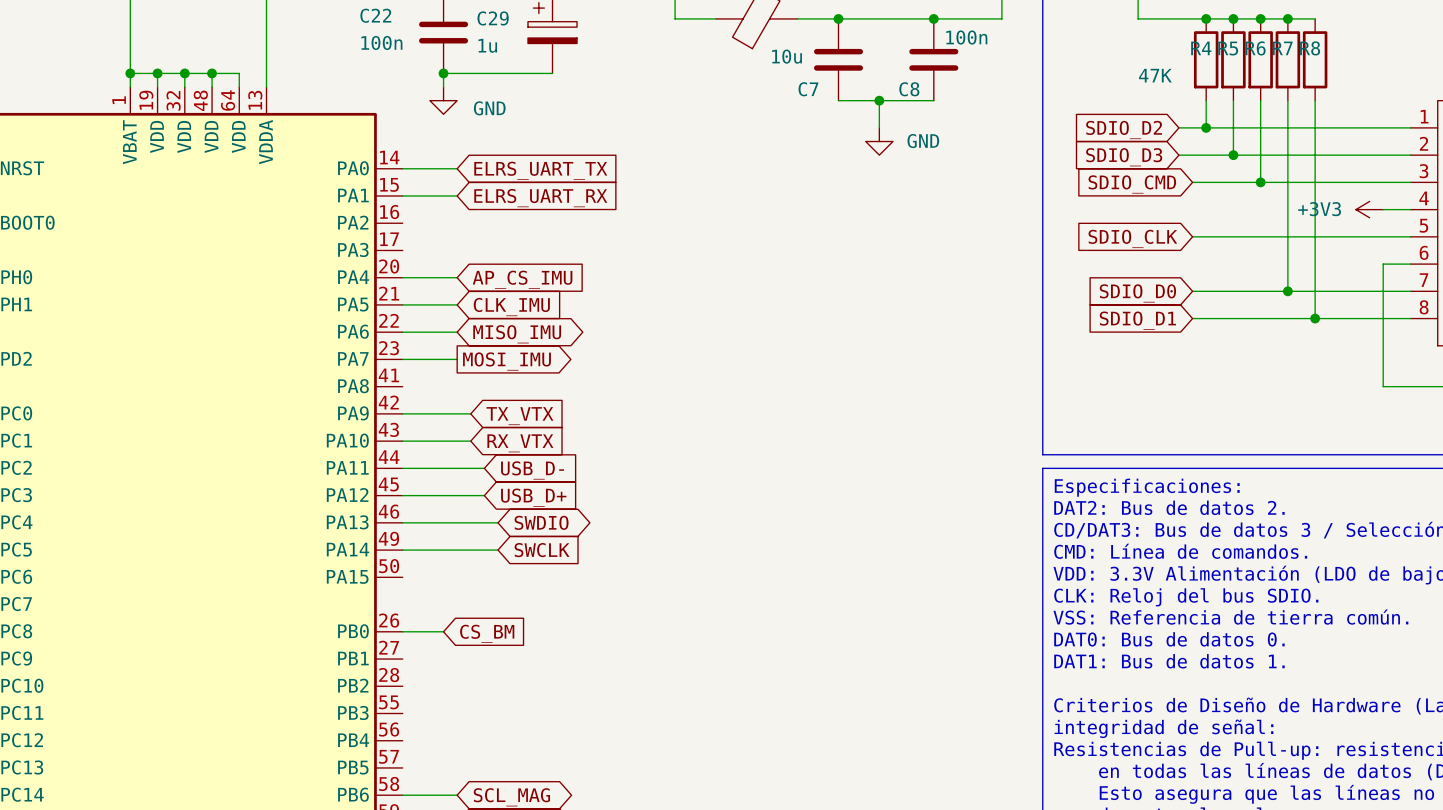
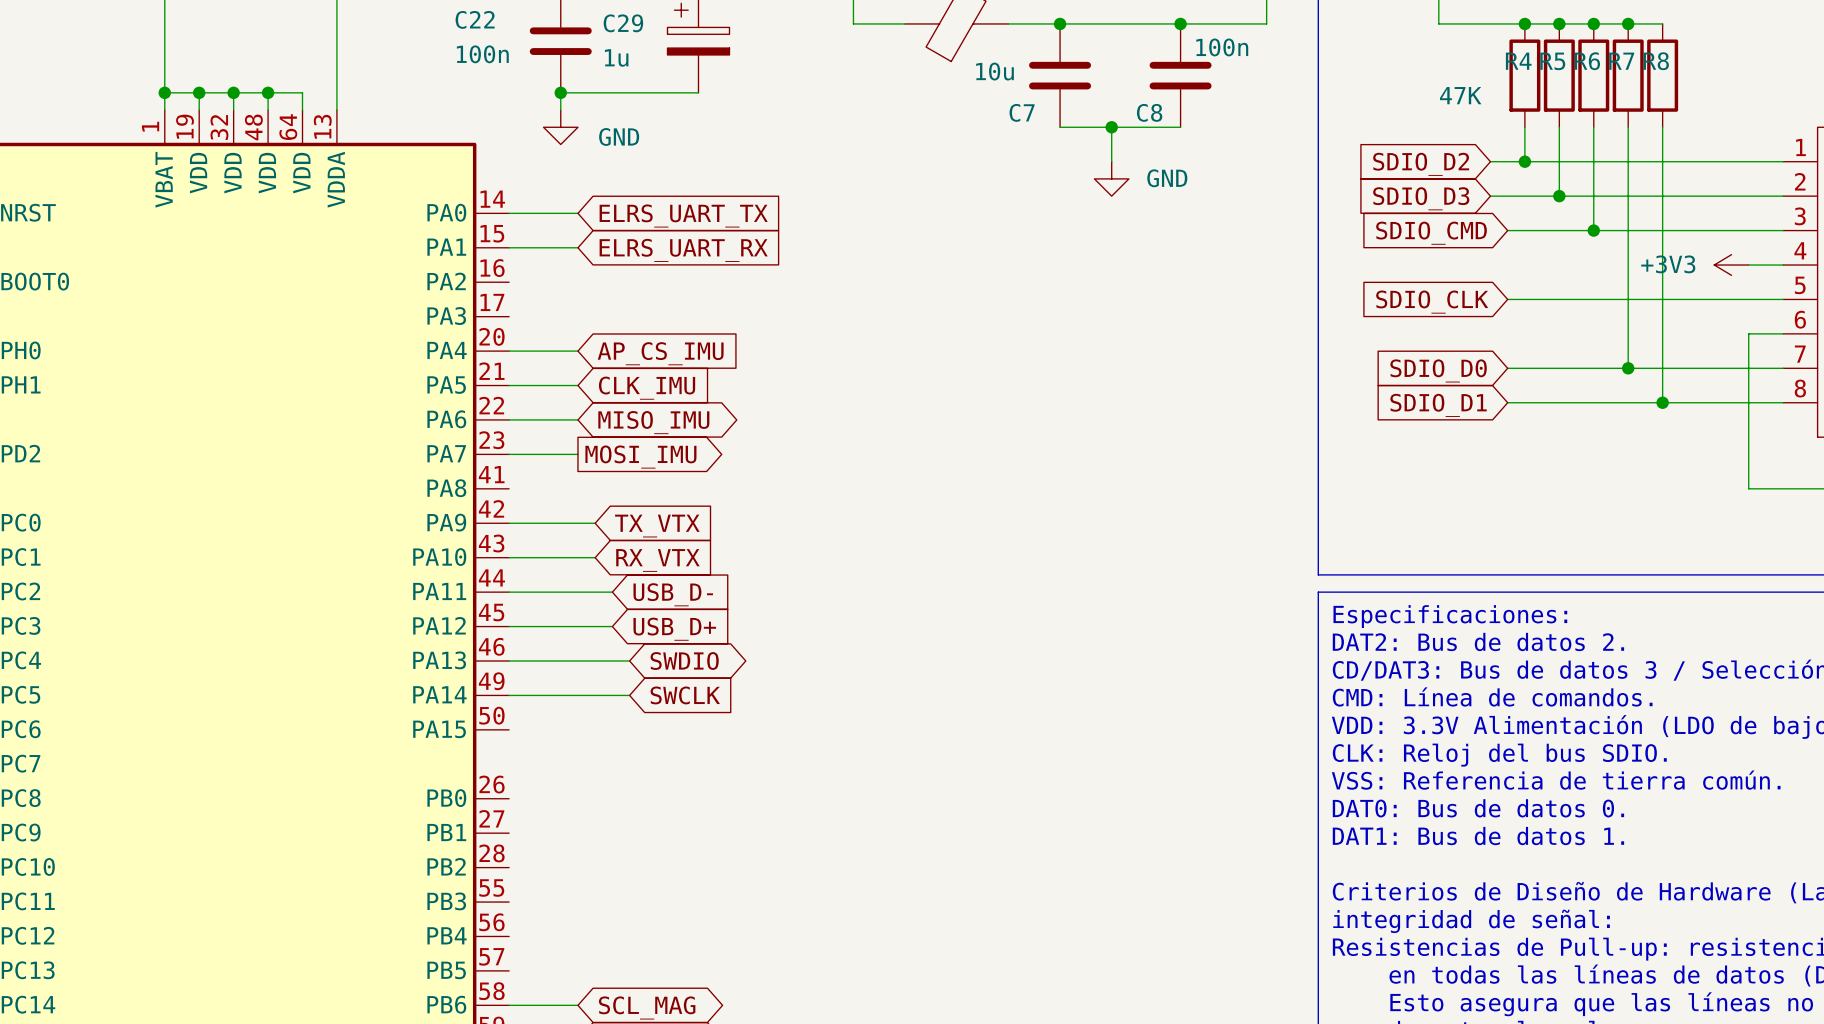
wire: (402, 631) (443, 631) -> none
global label: CS_BM (487, 633) -> none

